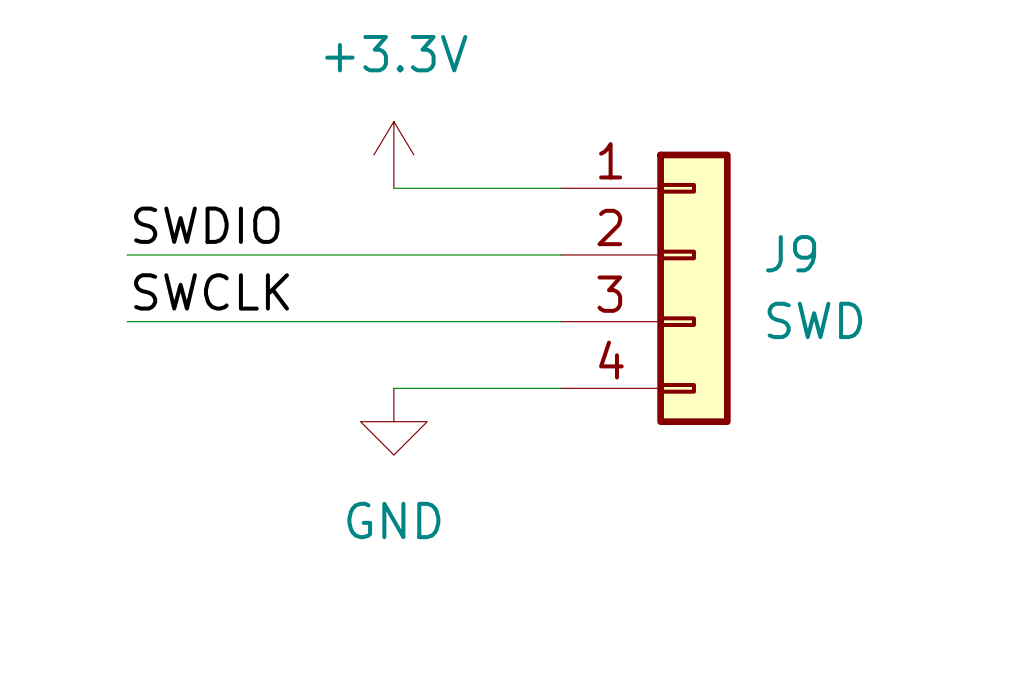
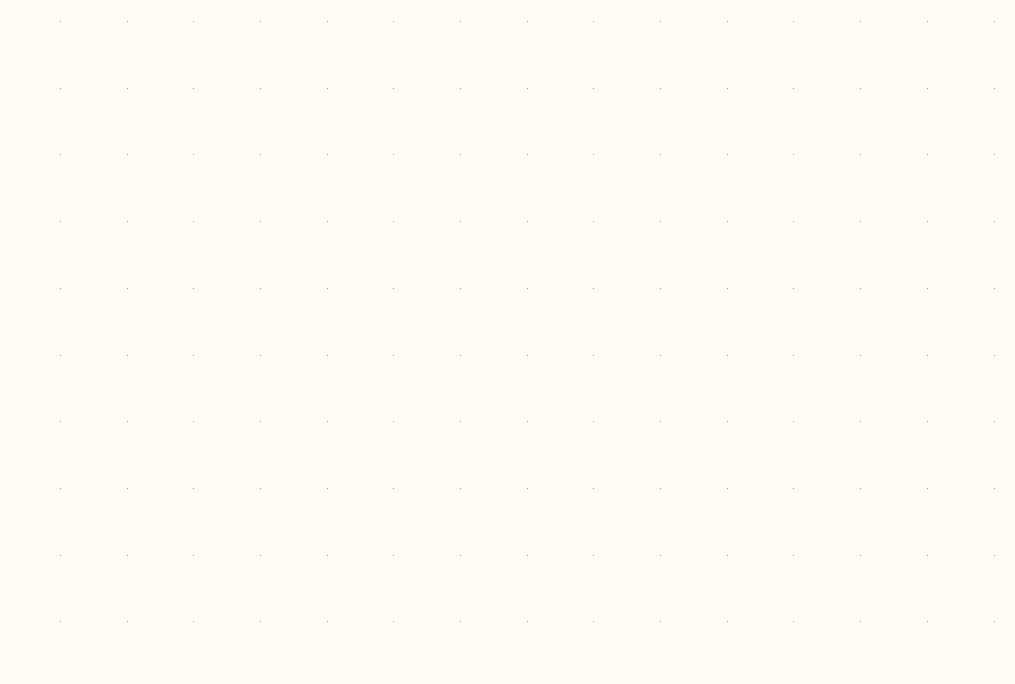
power symbol: +3.3V (393, 154) -> none
wire: (393, 188) (560, 188) -> none
label: SWDIO (206, 225) -> none
wire: (127, 254) (560, 254) -> none
J9: SWD (645, 288) -> none
label: SWCLK (211, 291) -> none
wire: (127, 321) (560, 321) -> none
wire: (393, 388) (560, 388) -> none
power symbol: GND (393, 421) -> none

